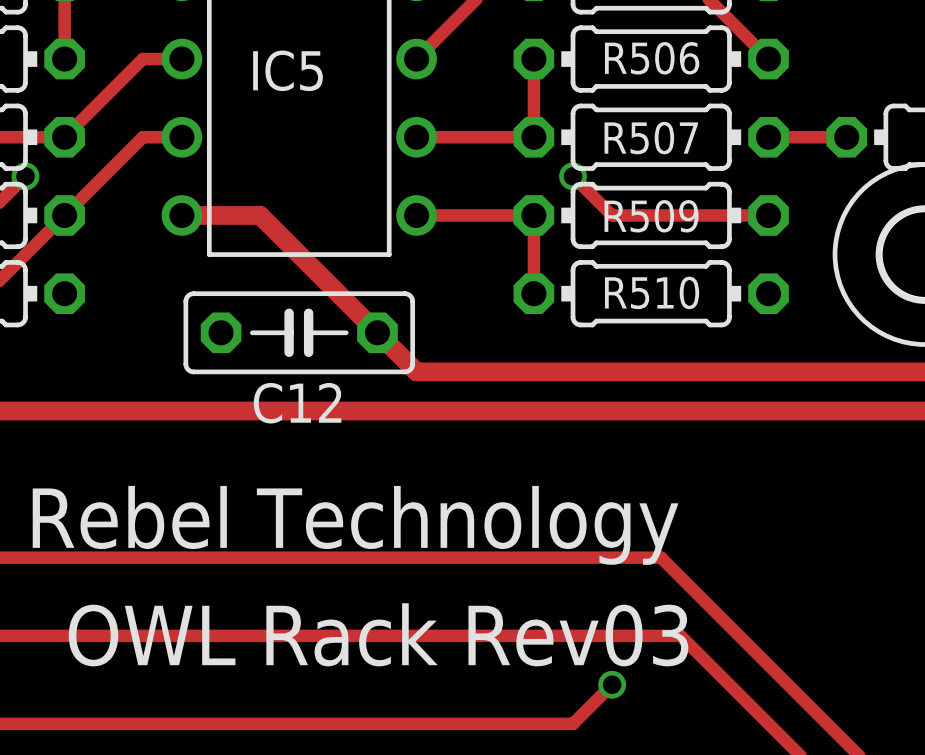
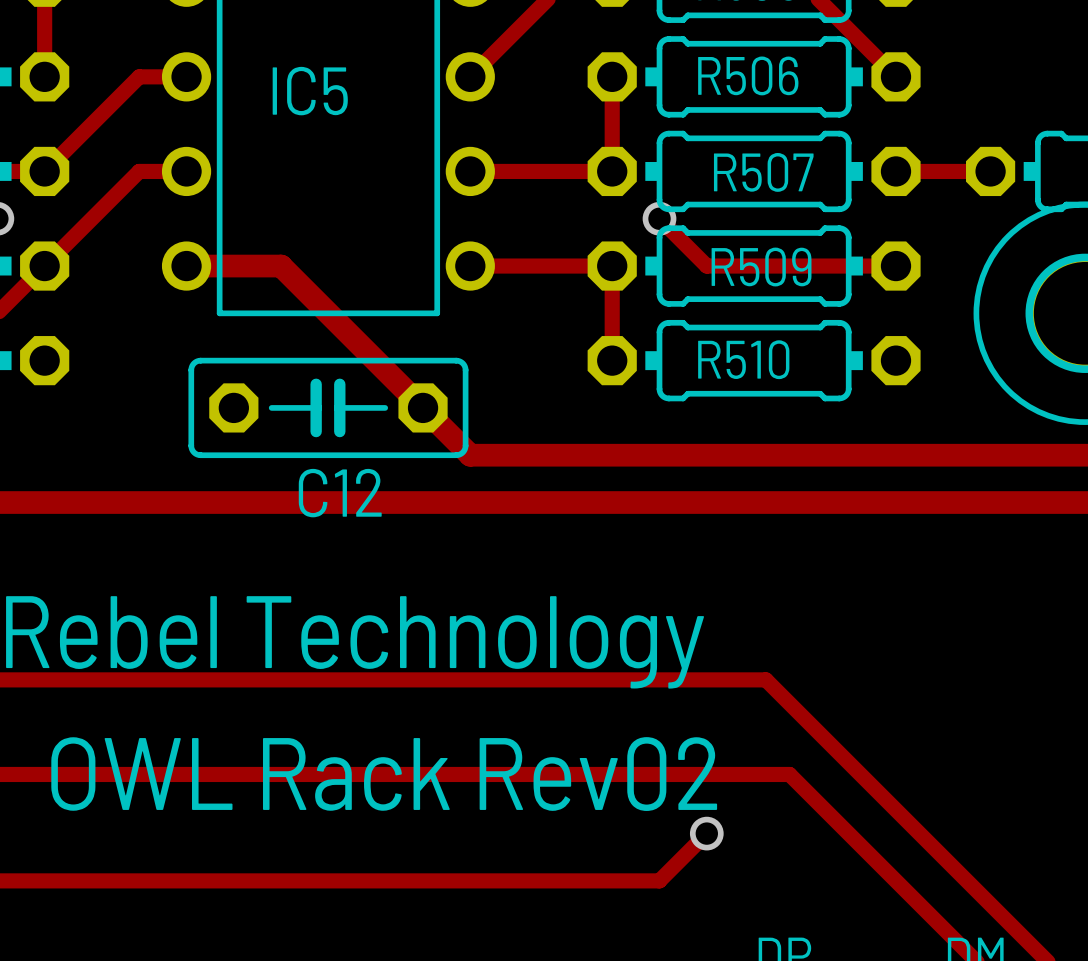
text: OWL Rack Rev03 (378, 634) -> OWL Rack Rev02 (384, 774)

